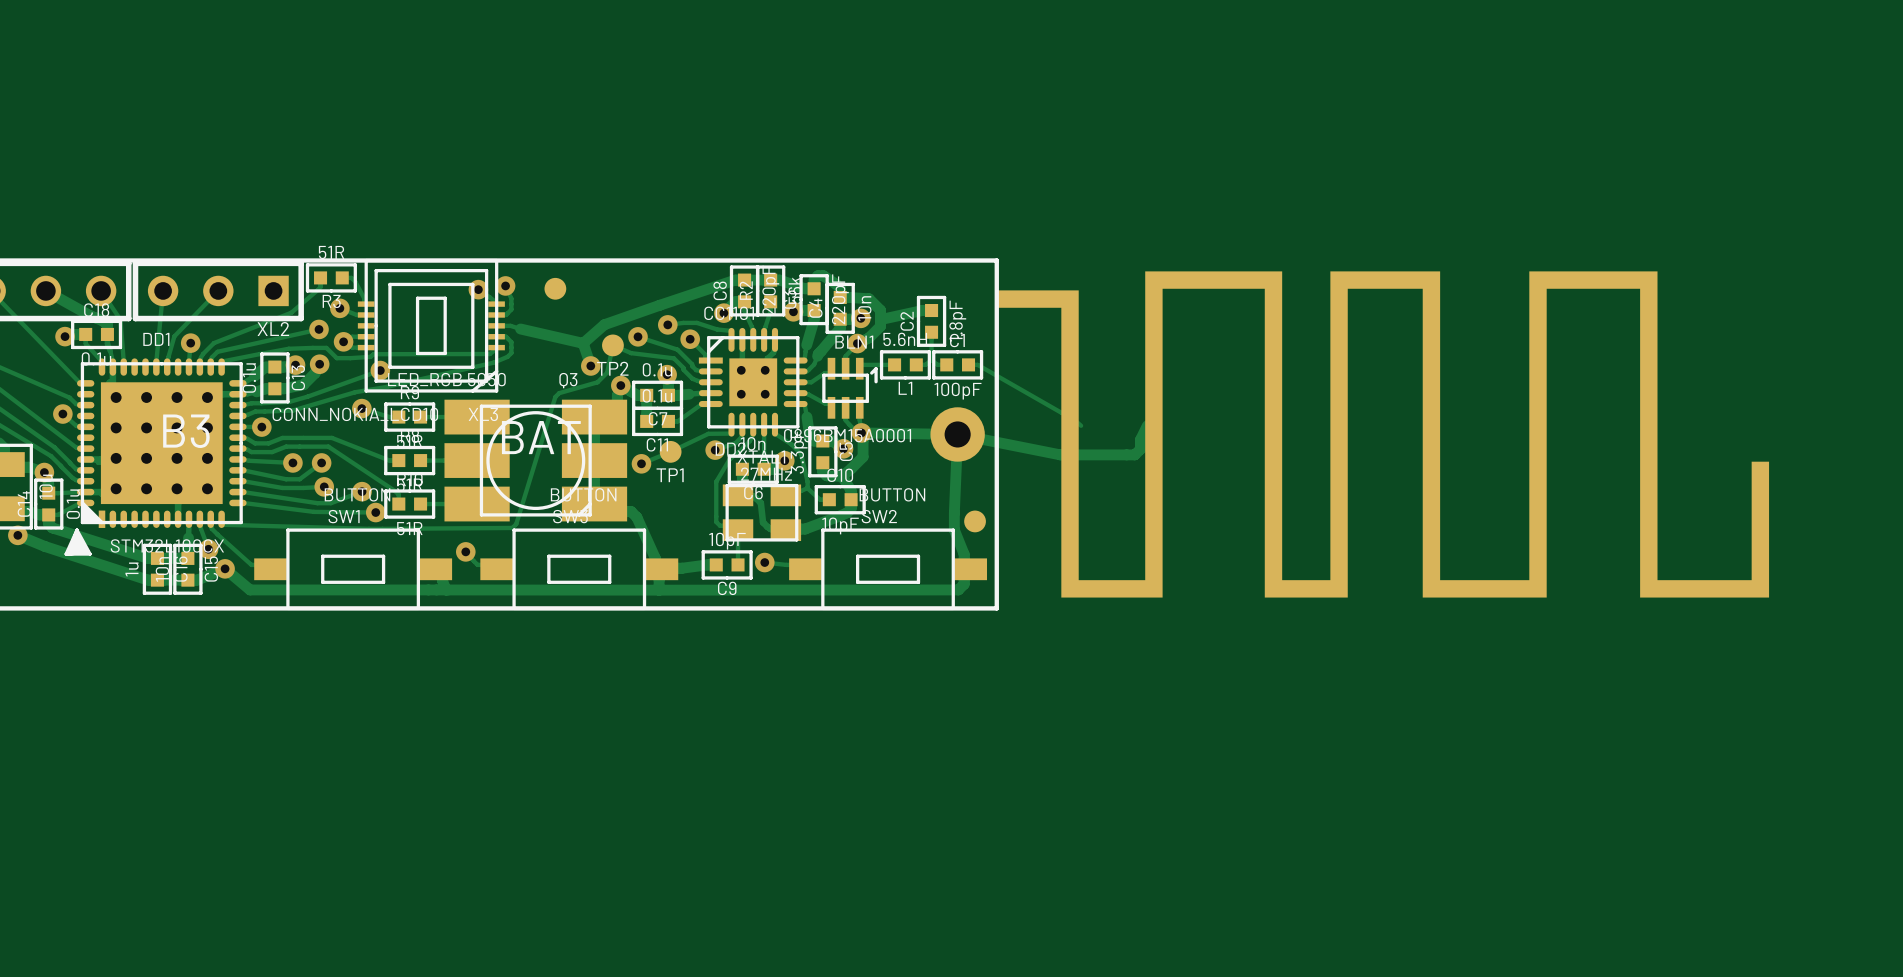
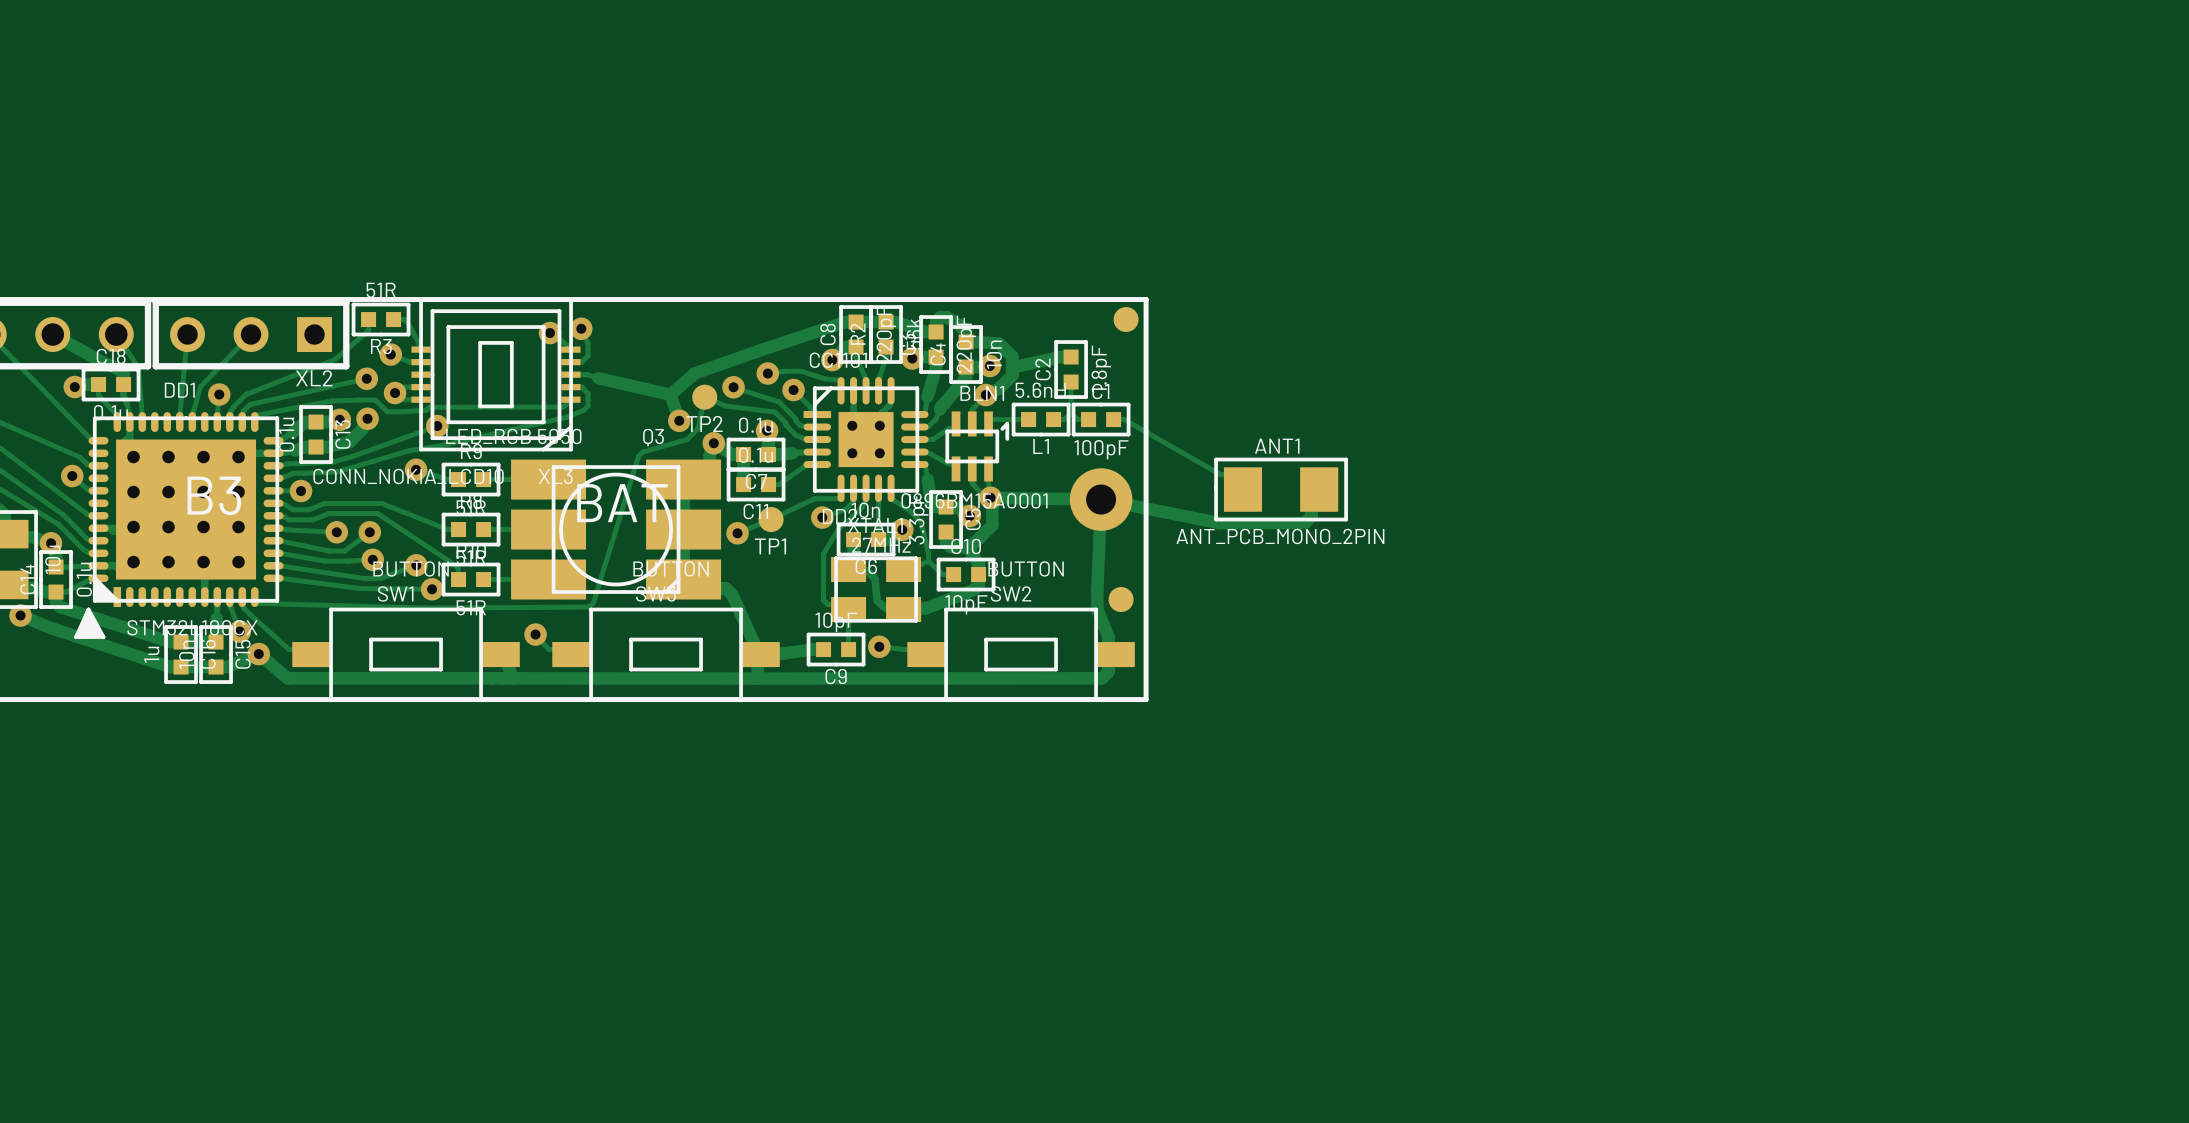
part position: (555, 288) -> (1126, 319)
ANT1: none -> ANT_PCB_MONO_2PIN (1281, 489)
part: (1382, 434) -> none

